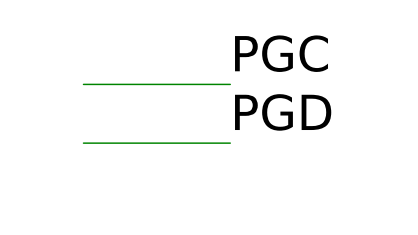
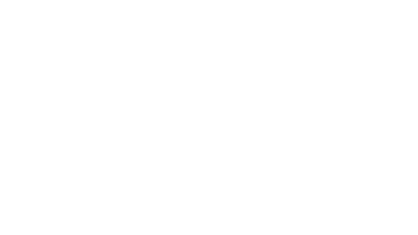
label: PGC (281, 53) -> none
wire: (83, 84) (230, 84) -> none
label: PGD (283, 112) -> none
wire: (83, 143) (230, 143) -> none

